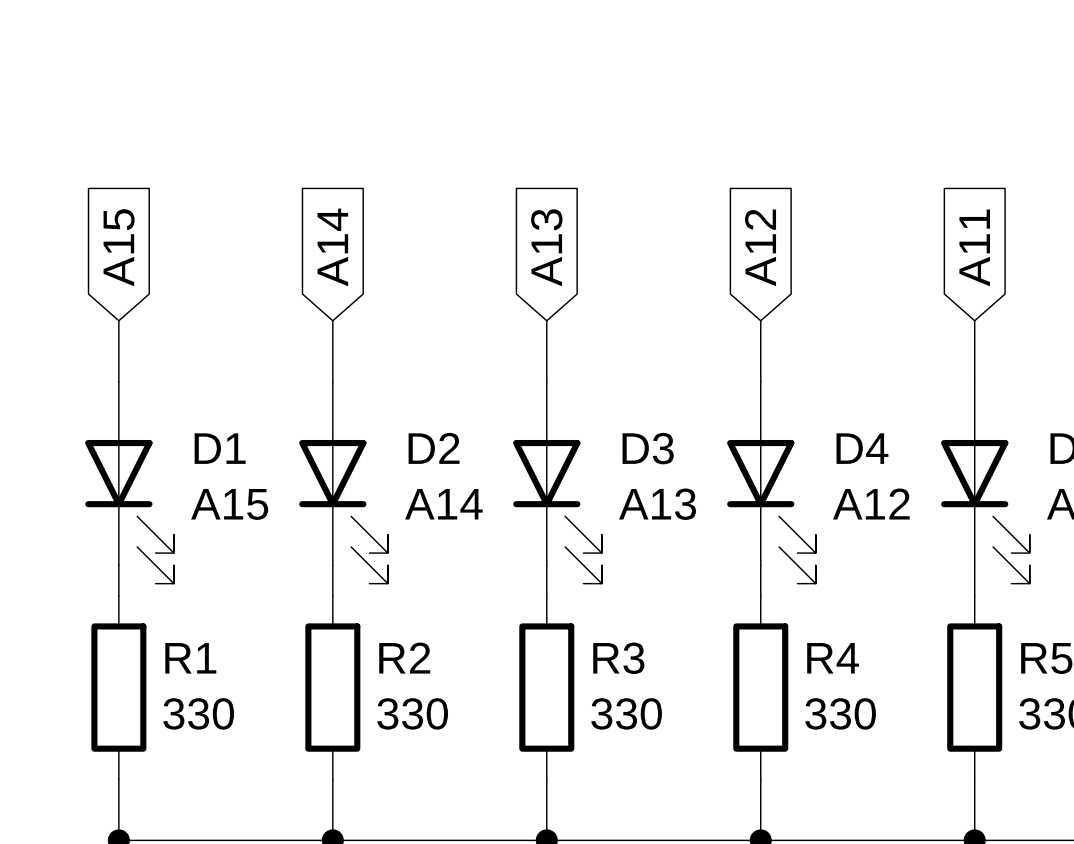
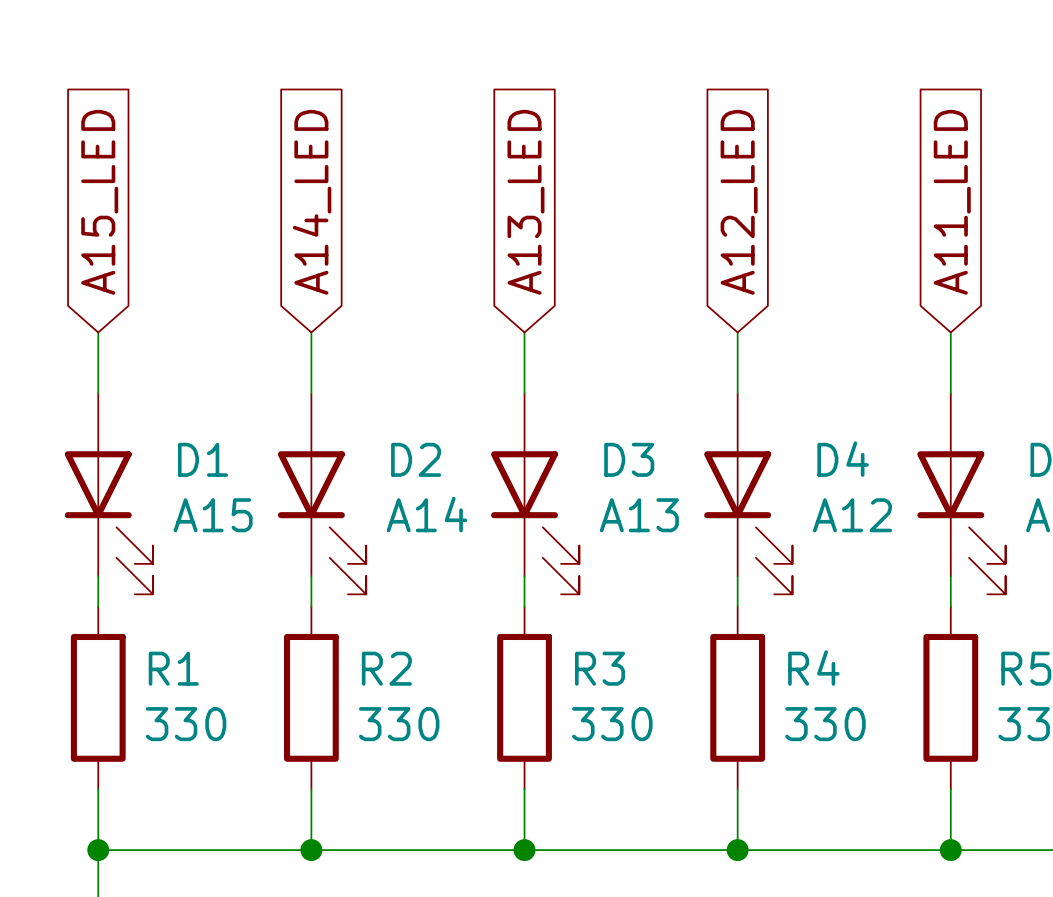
global label: A15 (119, 247) -> A15_LED (99, 202)
global label: A14 (332, 247) -> A14_LED (312, 202)
global label: A13 (546, 247) -> A13_LED (525, 202)
global label: A12 (760, 247) -> A12_LED (739, 202)
global label: A11 (974, 247) -> A11_LED (952, 202)

